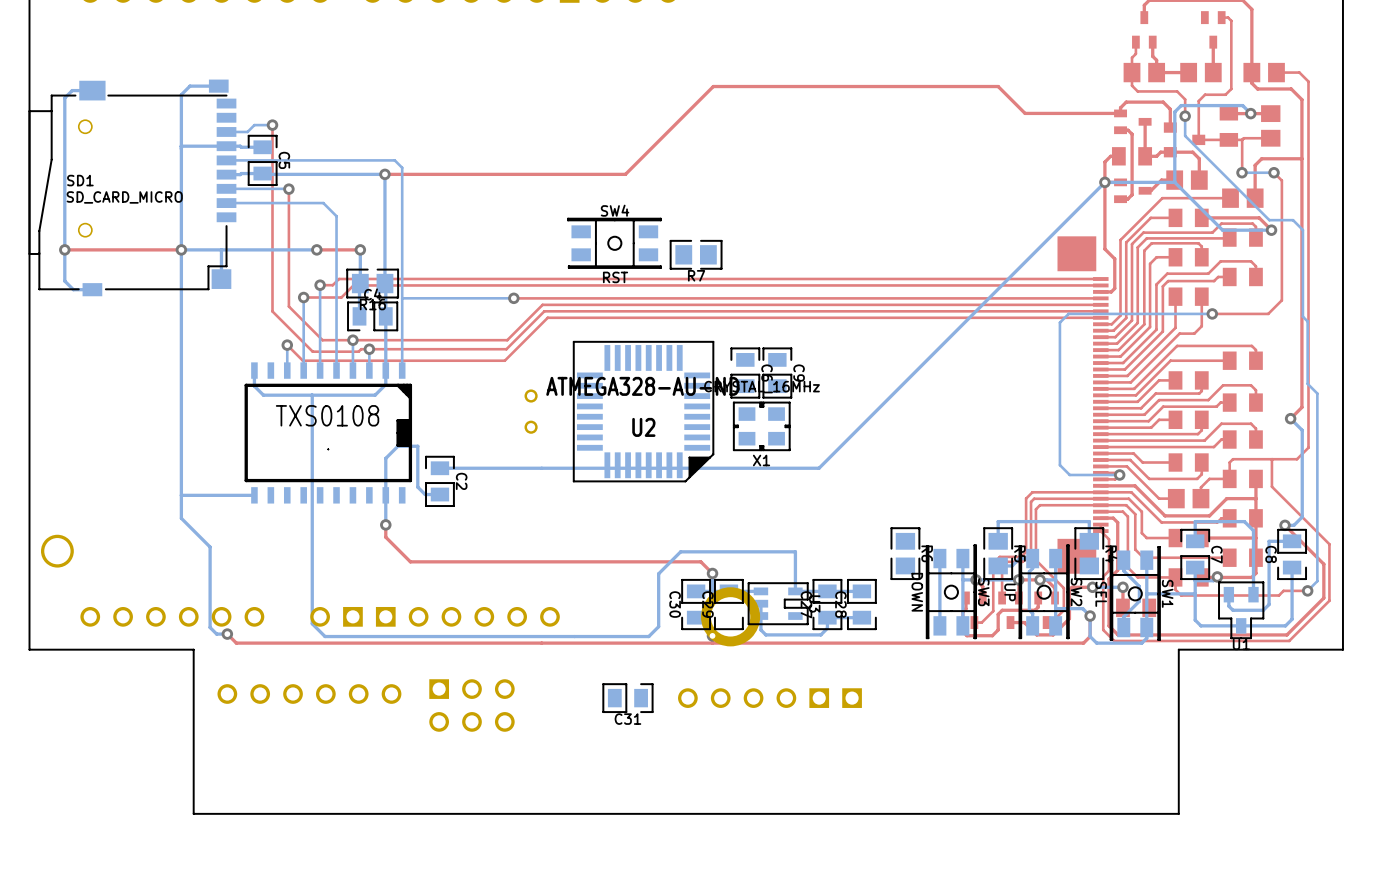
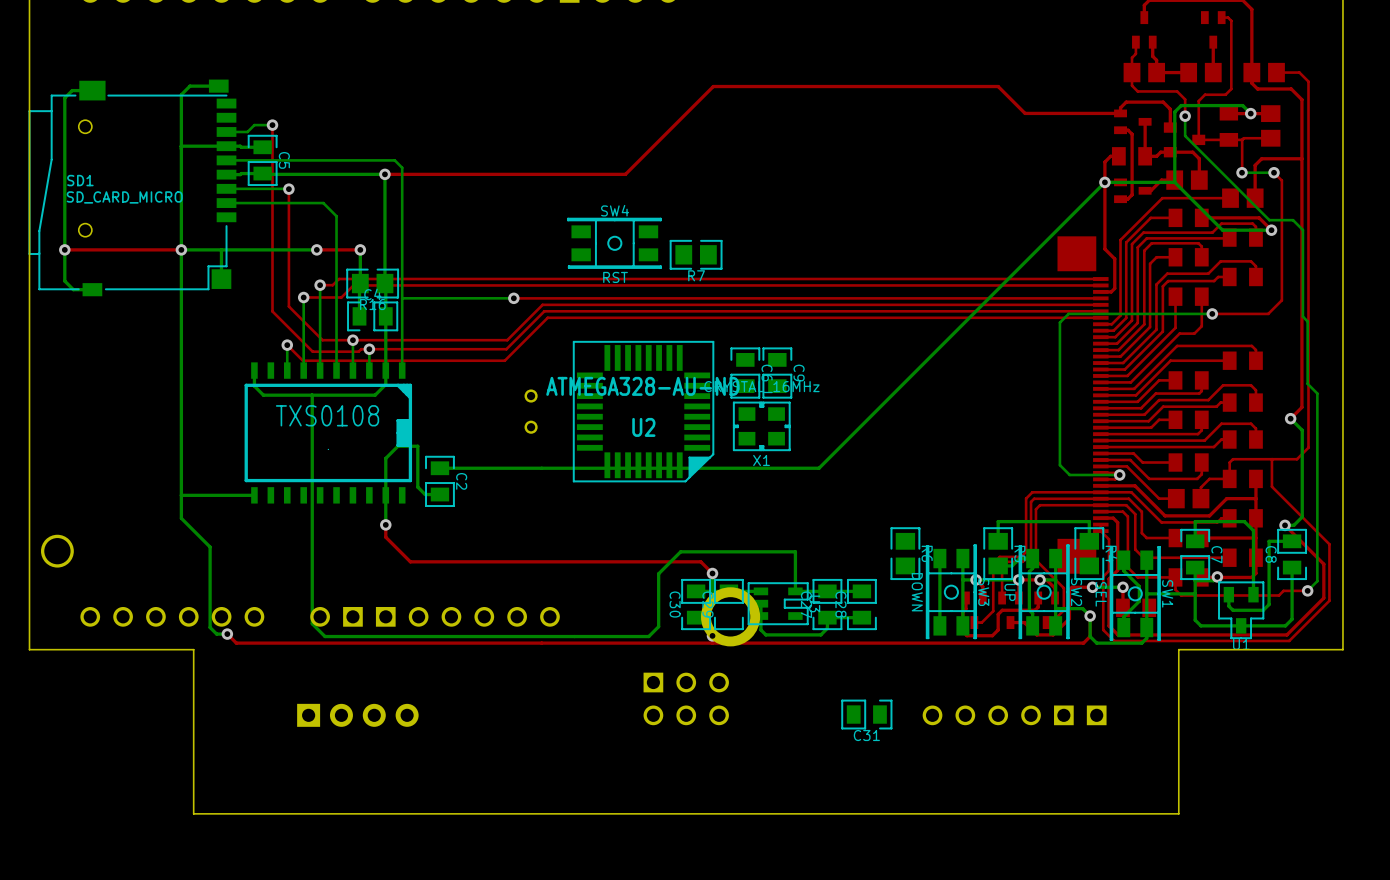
part: (309, 694) -> none
C31 position: (627, 698) -> (866, 714)
part position: (769, 698) -> (1014, 715)
part position: (471, 705) -> (686, 698)
part: none -> (357, 715)

